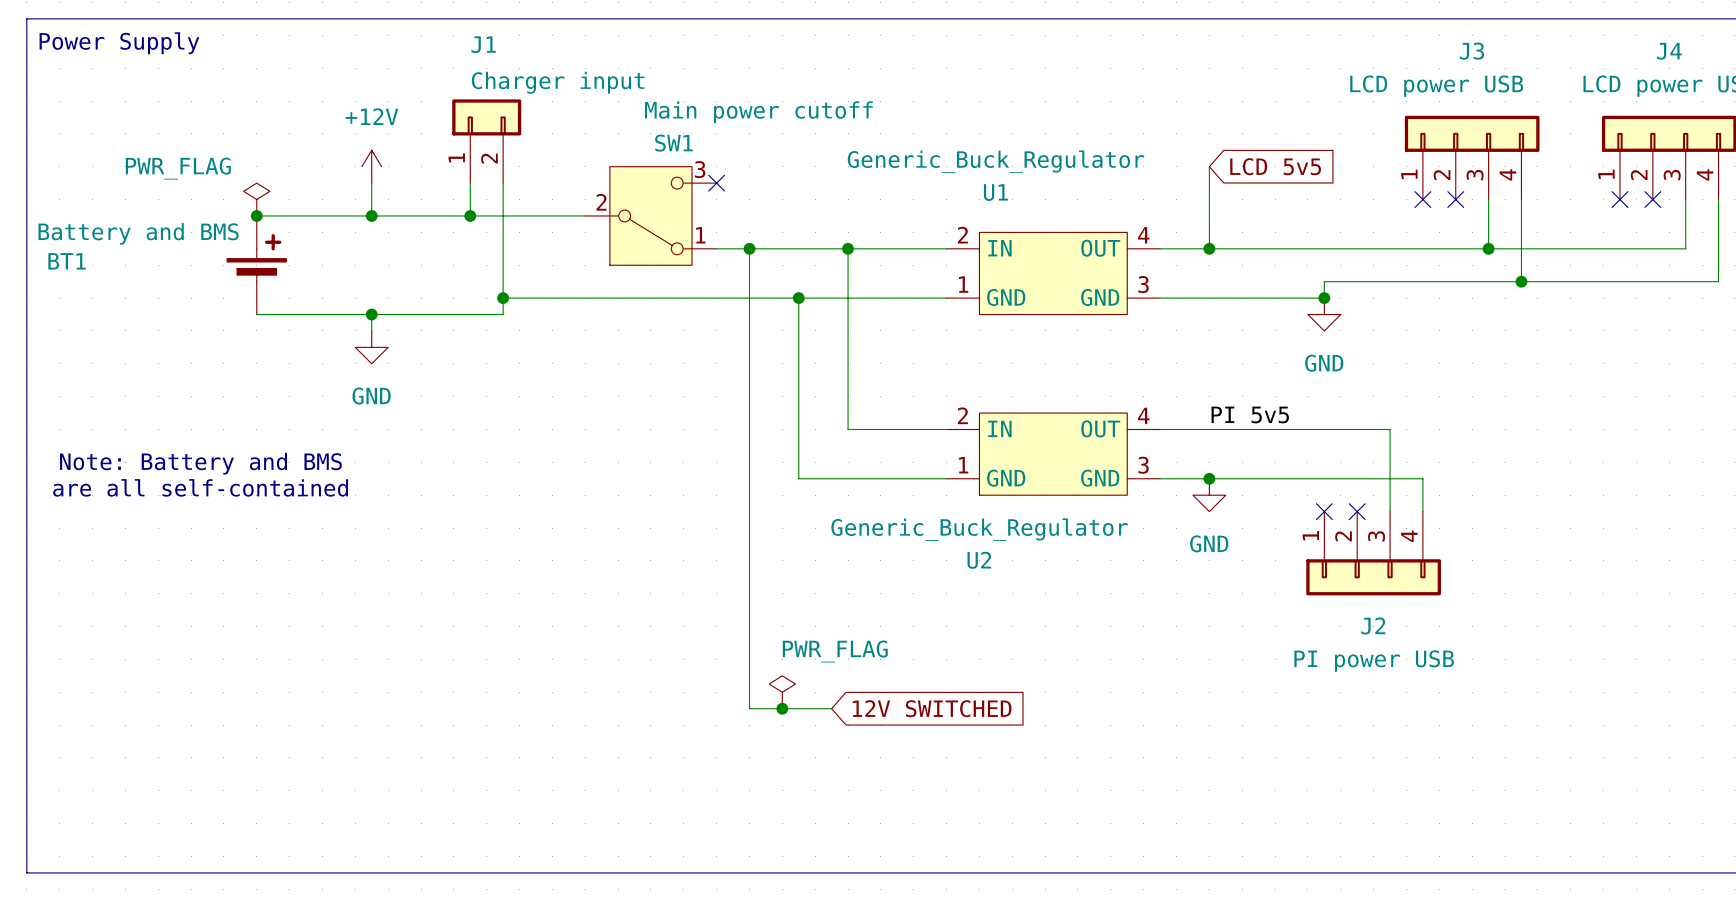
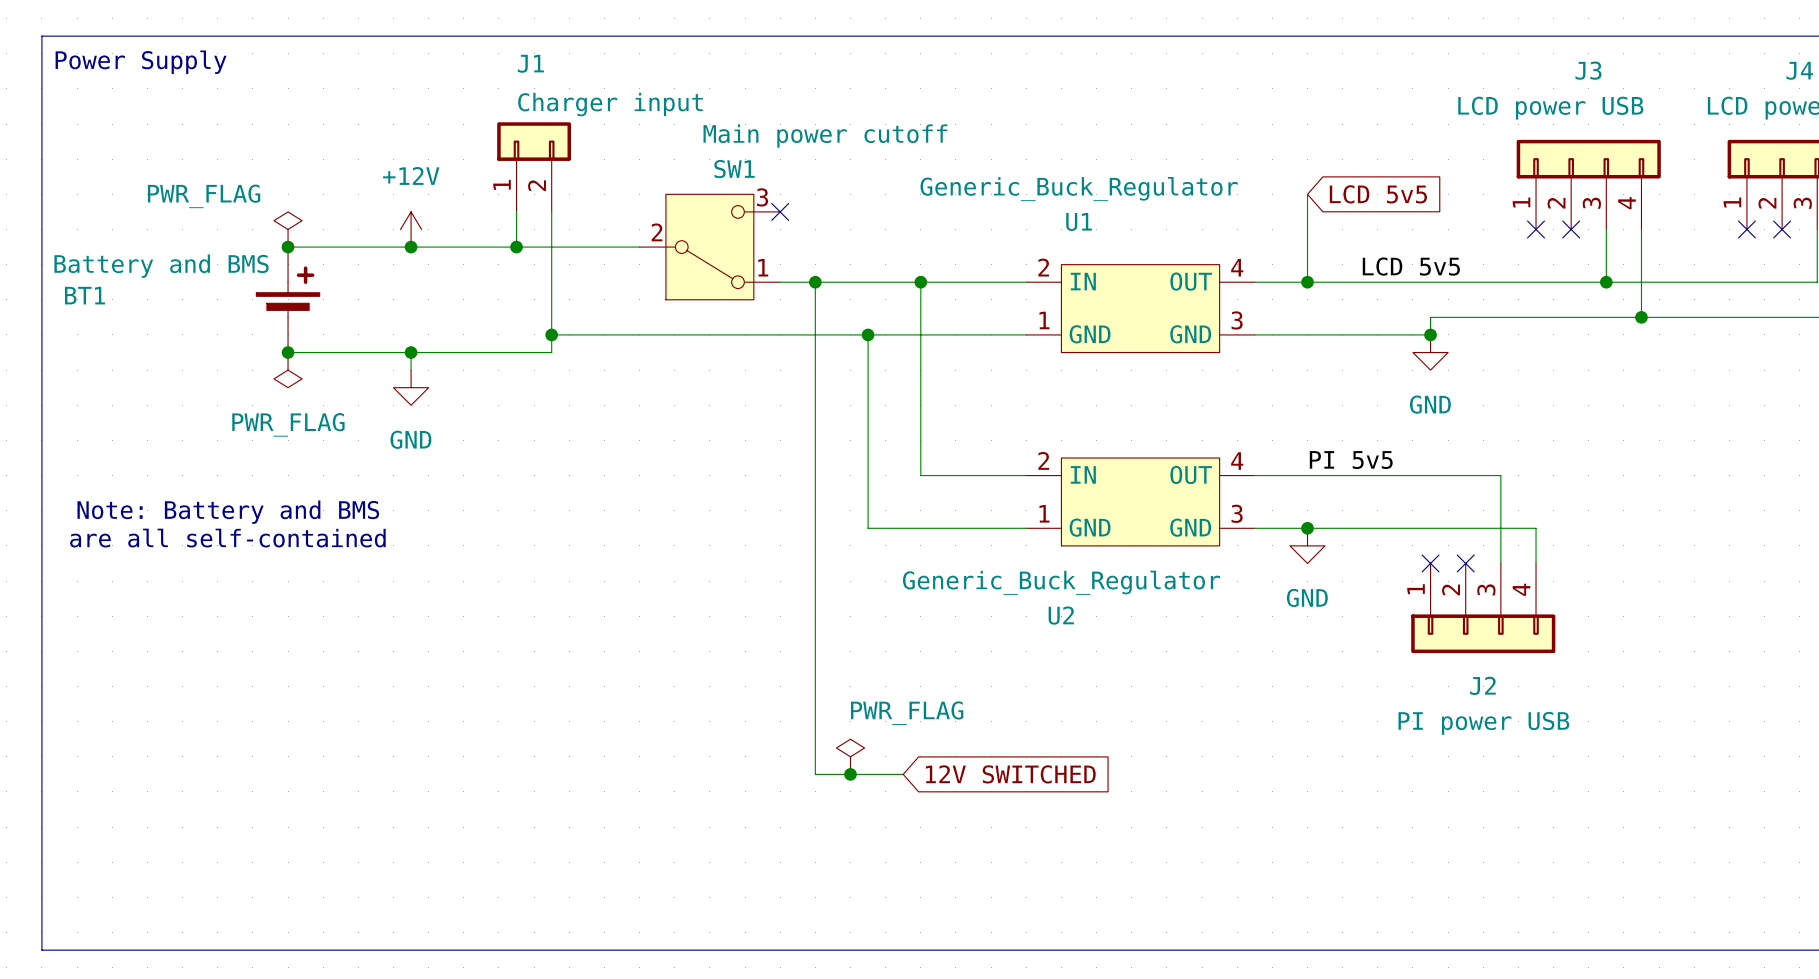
power symbol position: +12V (371, 166) -> +12V (411, 229)
label: none -> LCD 5v5 (1411, 266)
junction: none -> (288, 352)
power symbol: none -> PWR_FLAG (288, 370)

